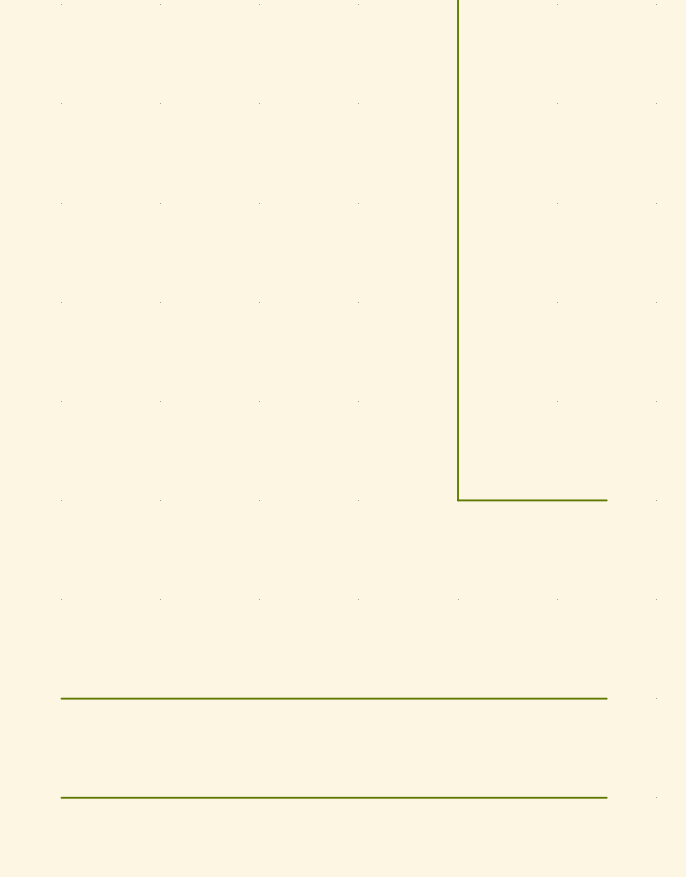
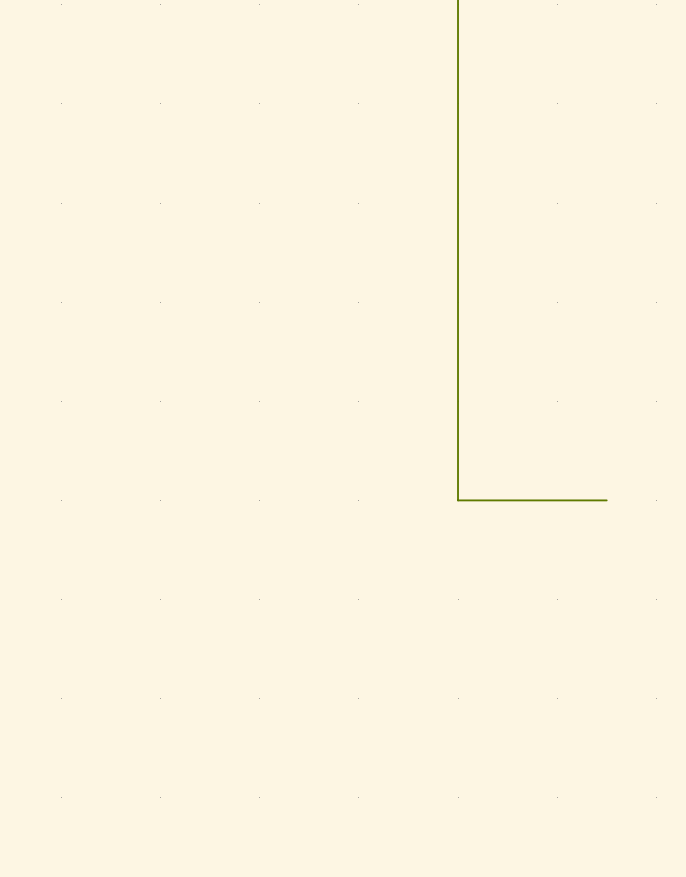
wire: (61, 698) (606, 698) -> none
wire: (61, 797) (606, 797) -> none

